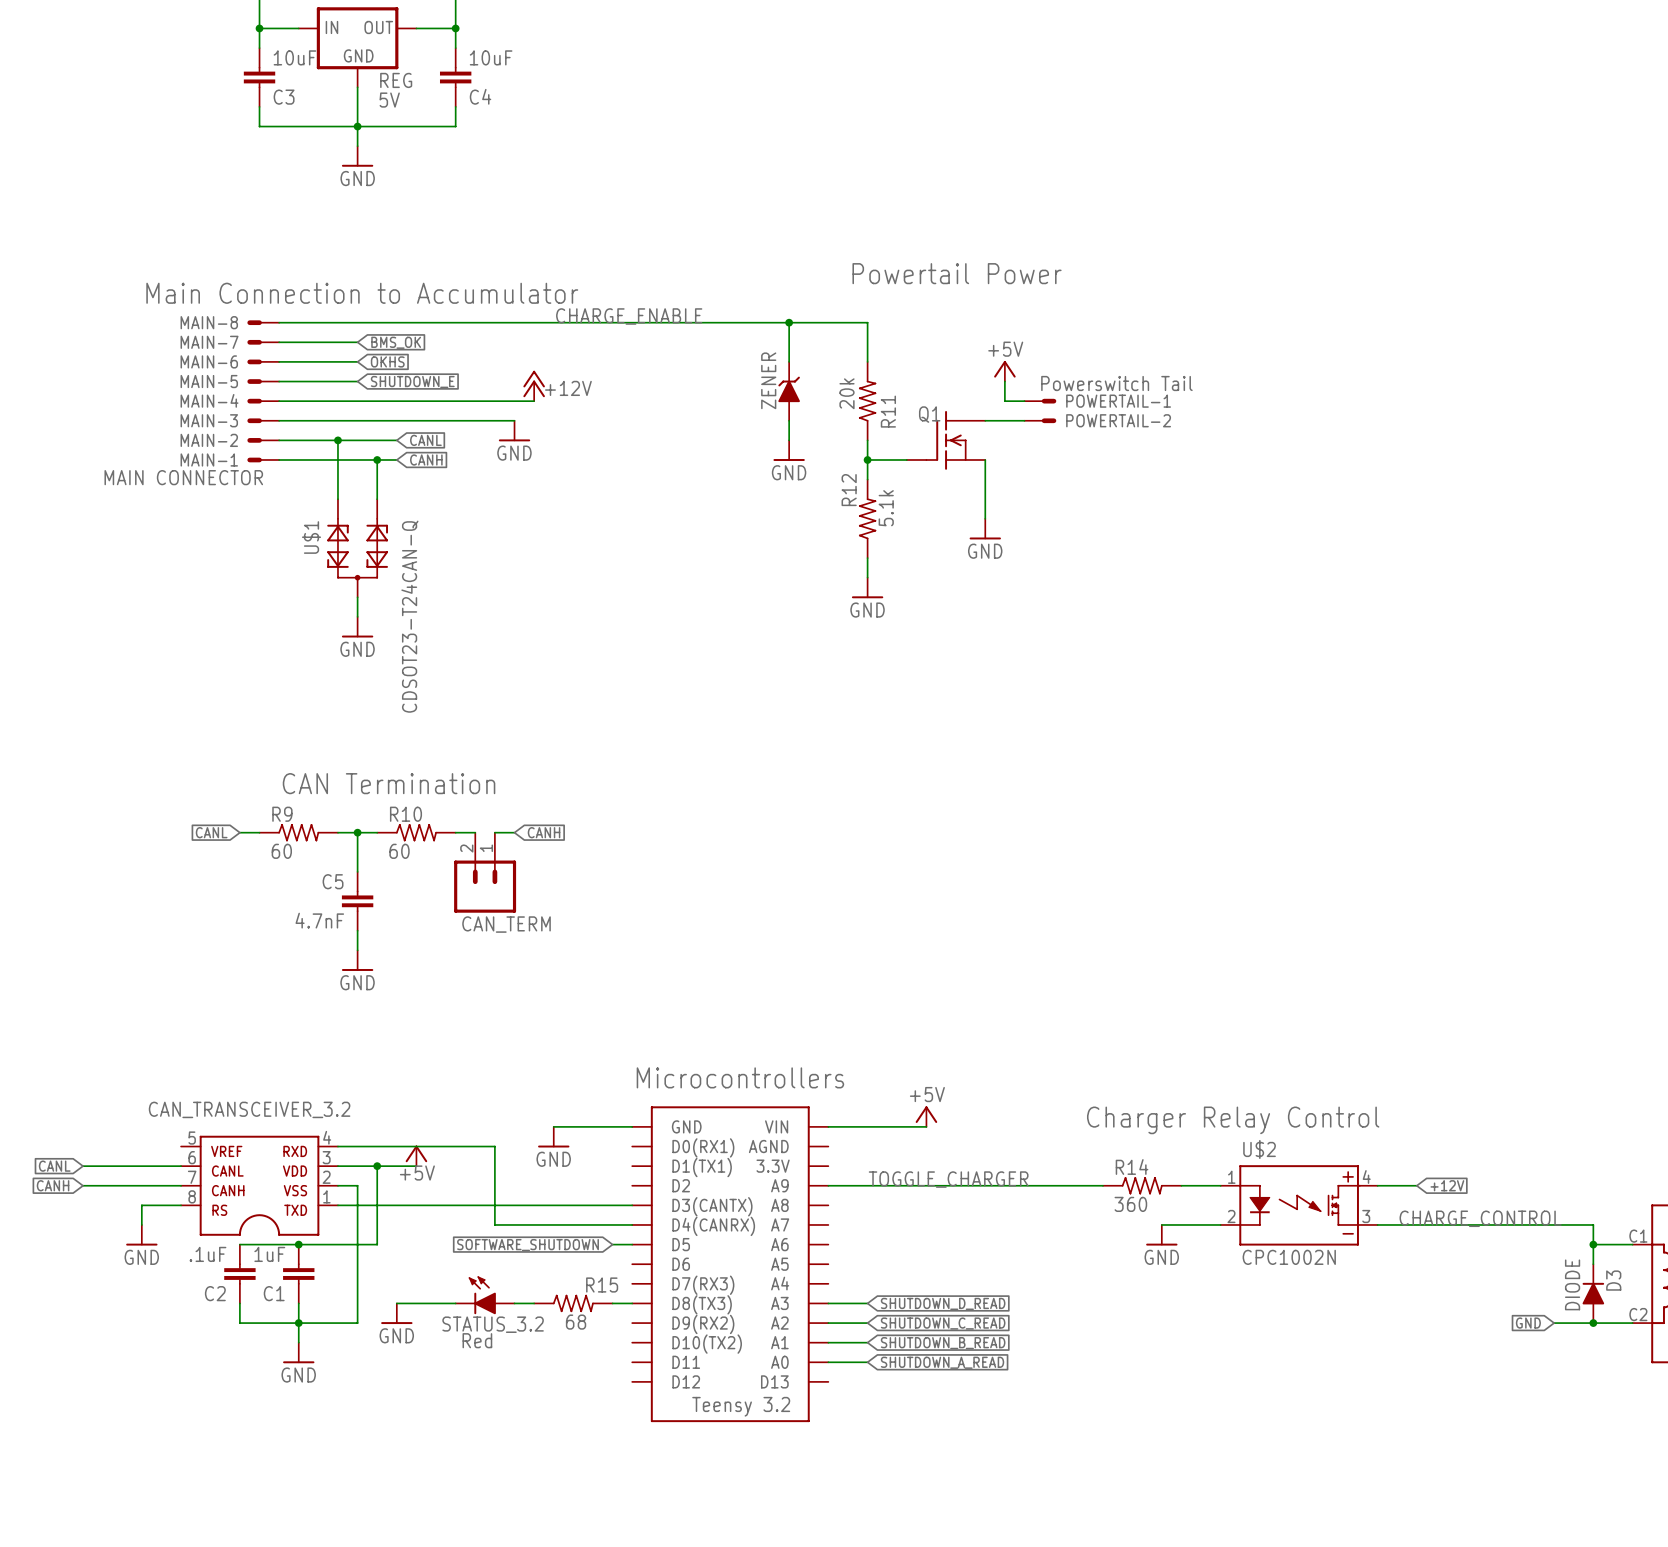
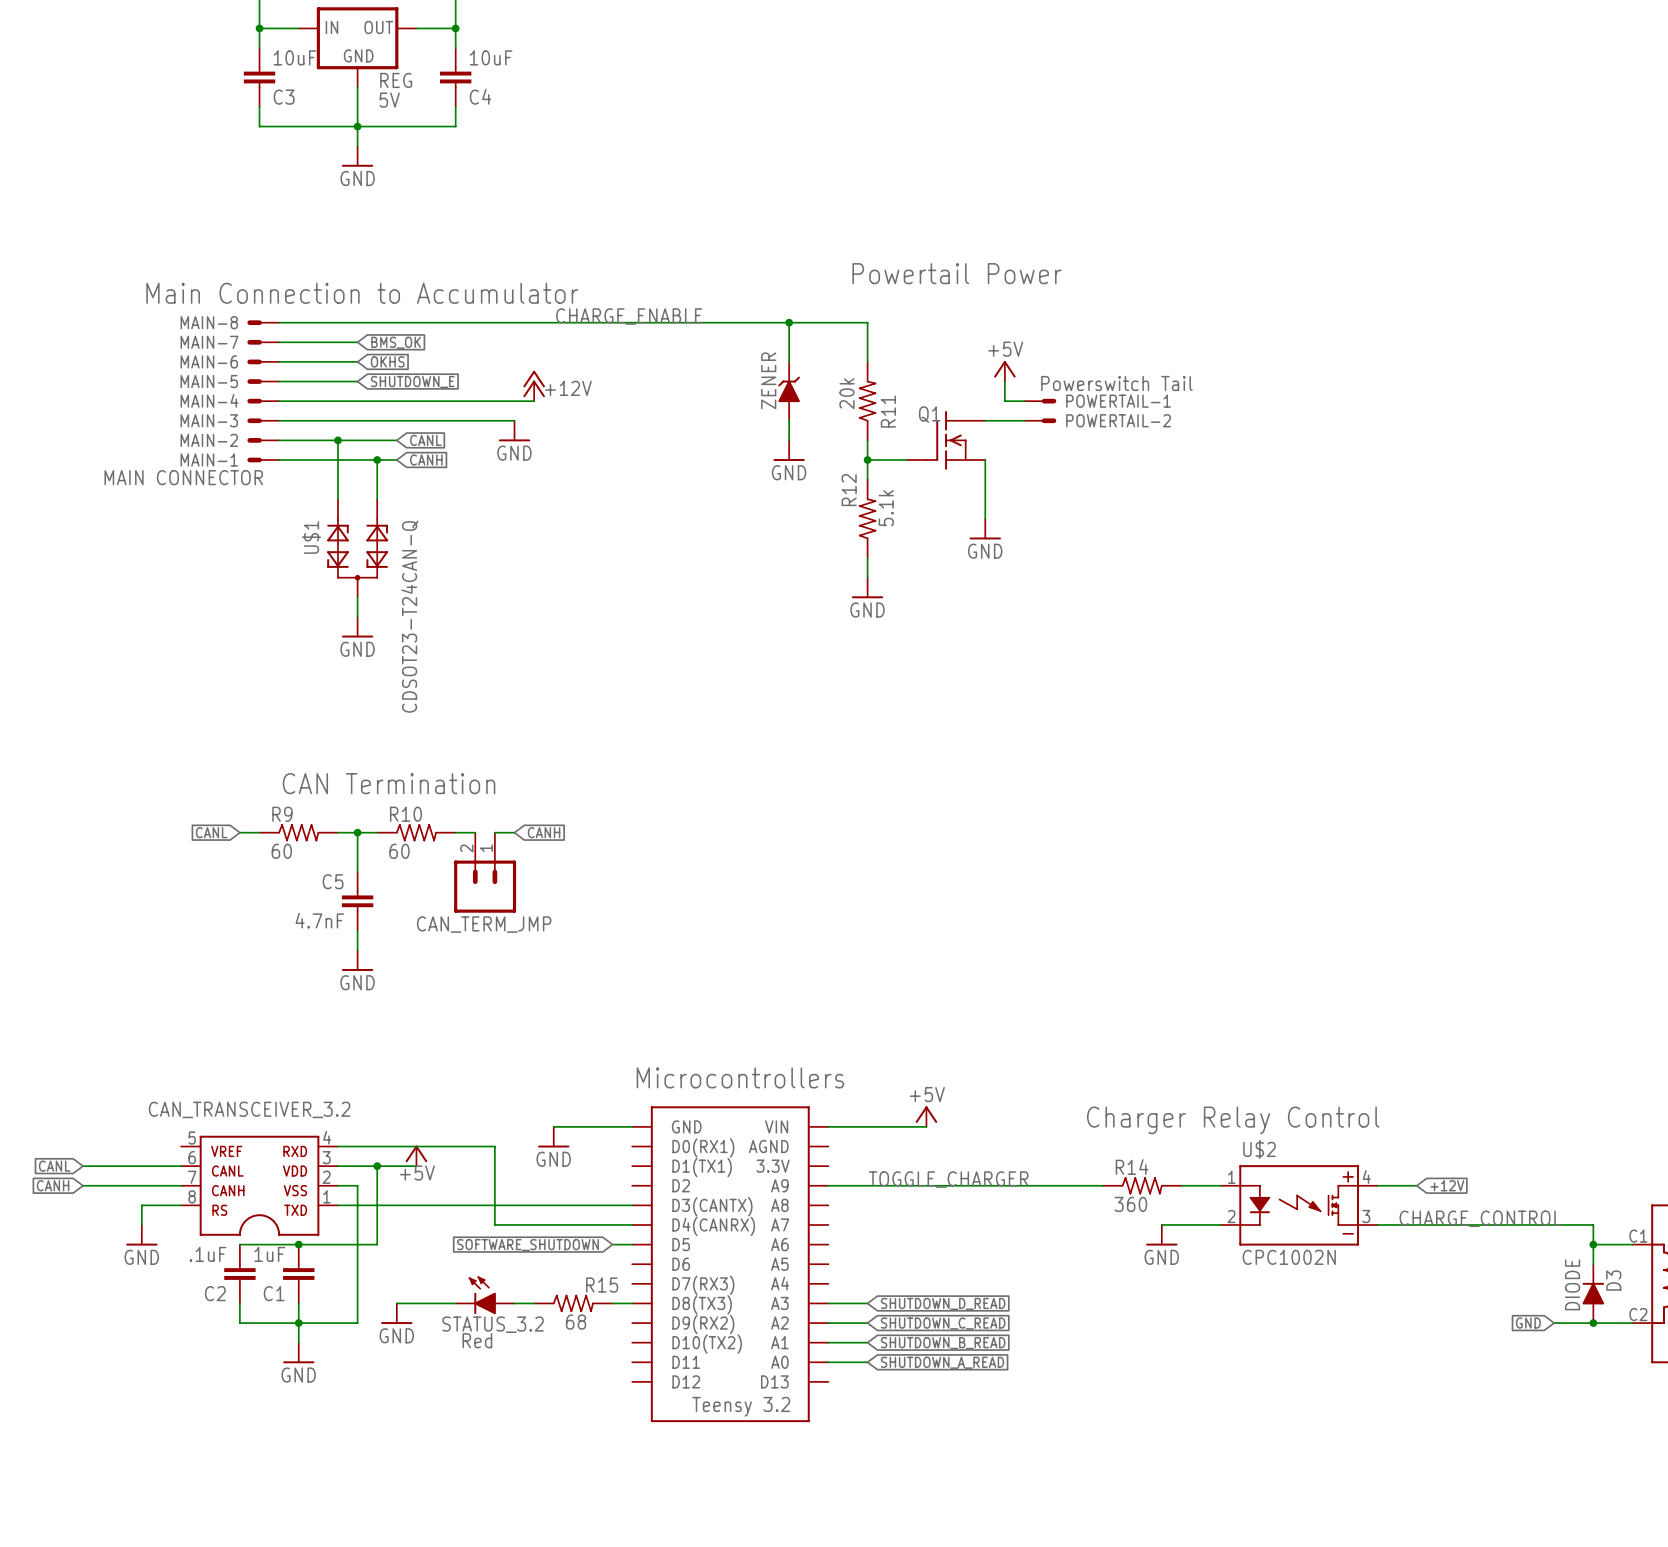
CAN_TERM name: CAN_TERM (506, 924) -> CAN_TERM_JMP (484, 924)

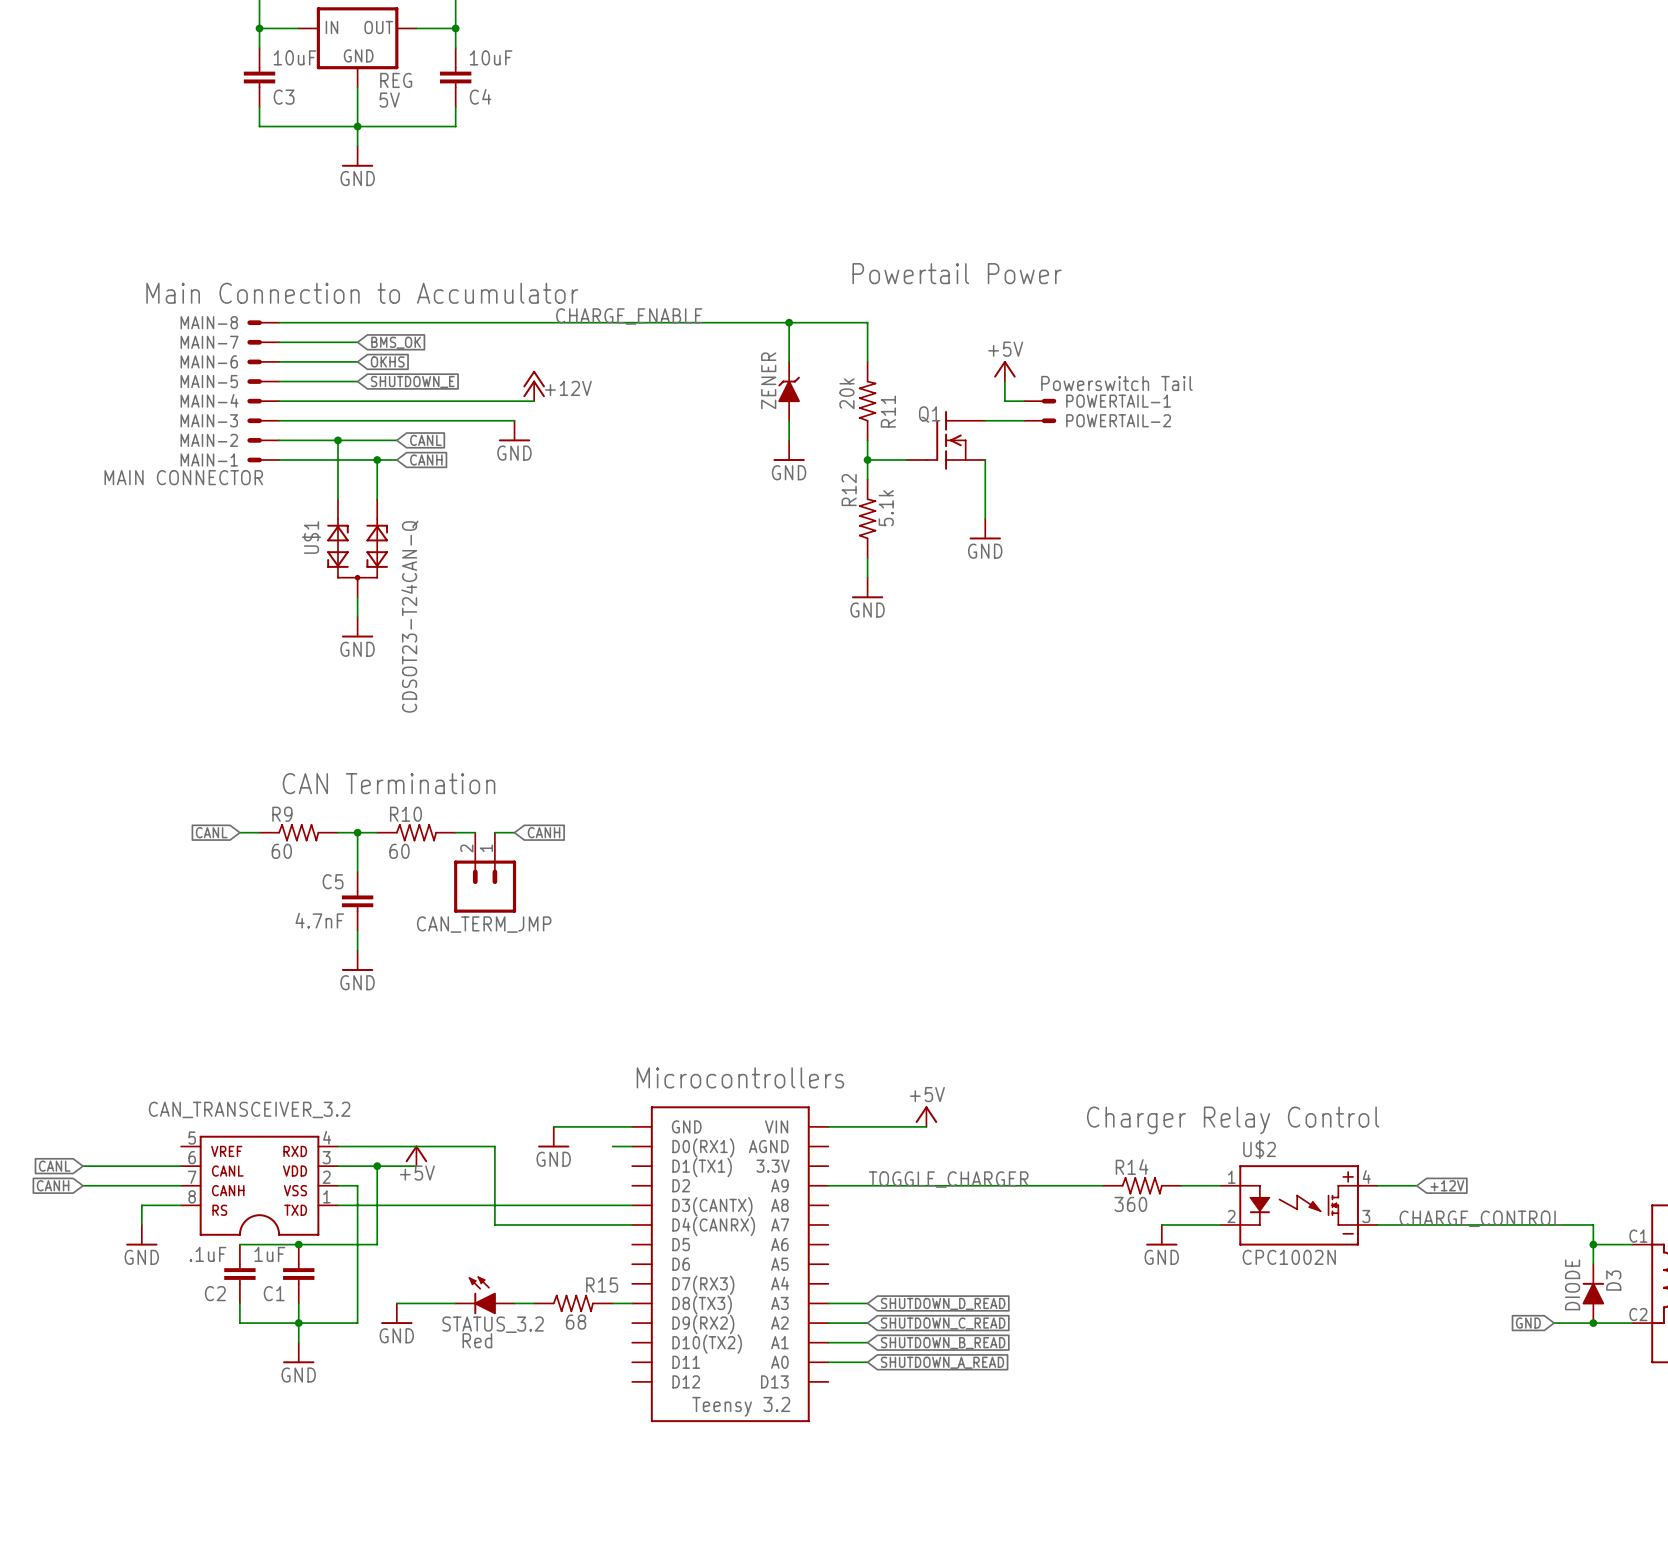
wire: (612, 1244) (632, 1244) -> (612, 1146) (632, 1146)
global label: SOFTWARE_SHUTDOWN (528, 1245) -> none

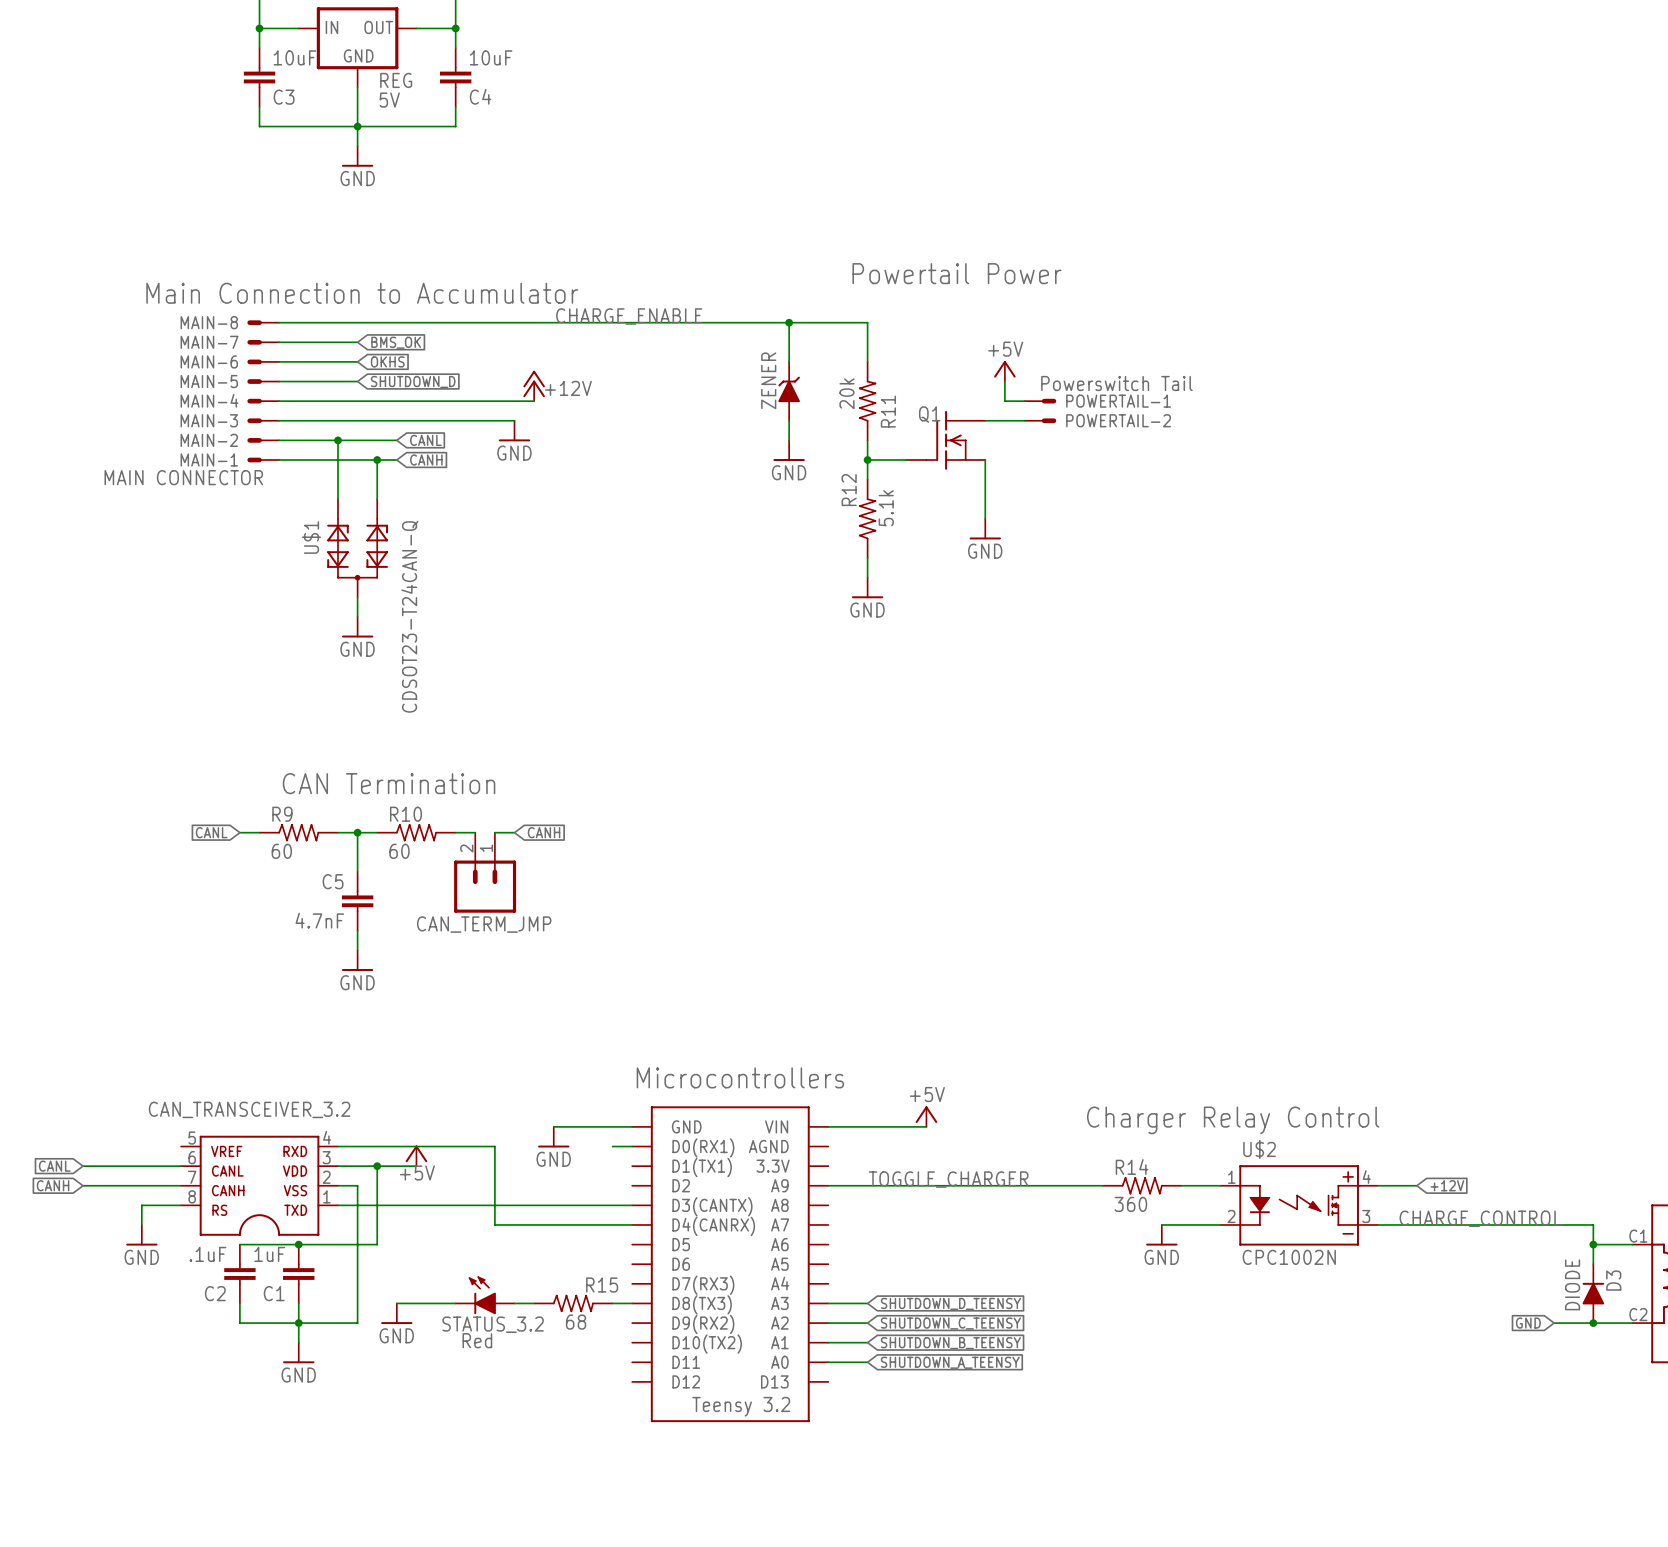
global label: SHUTDOWN_E (412, 382) -> SHUTDOWN_D (413, 382)
global label: SHUTDOWN_D_READ (943, 1303) -> SHUTDOWN_D_TEENSY (950, 1303)
global label: SHUTDOWN_C_READ (943, 1323) -> SHUTDOWN_C_TEENSY (950, 1323)
global label: SHUTDOWN_B_READ (943, 1343) -> SHUTDOWN_B_TEENSY (950, 1343)
global label: SHUTDOWN_A_READ (942, 1362) -> SHUTDOWN_A_TEENSY (950, 1362)

